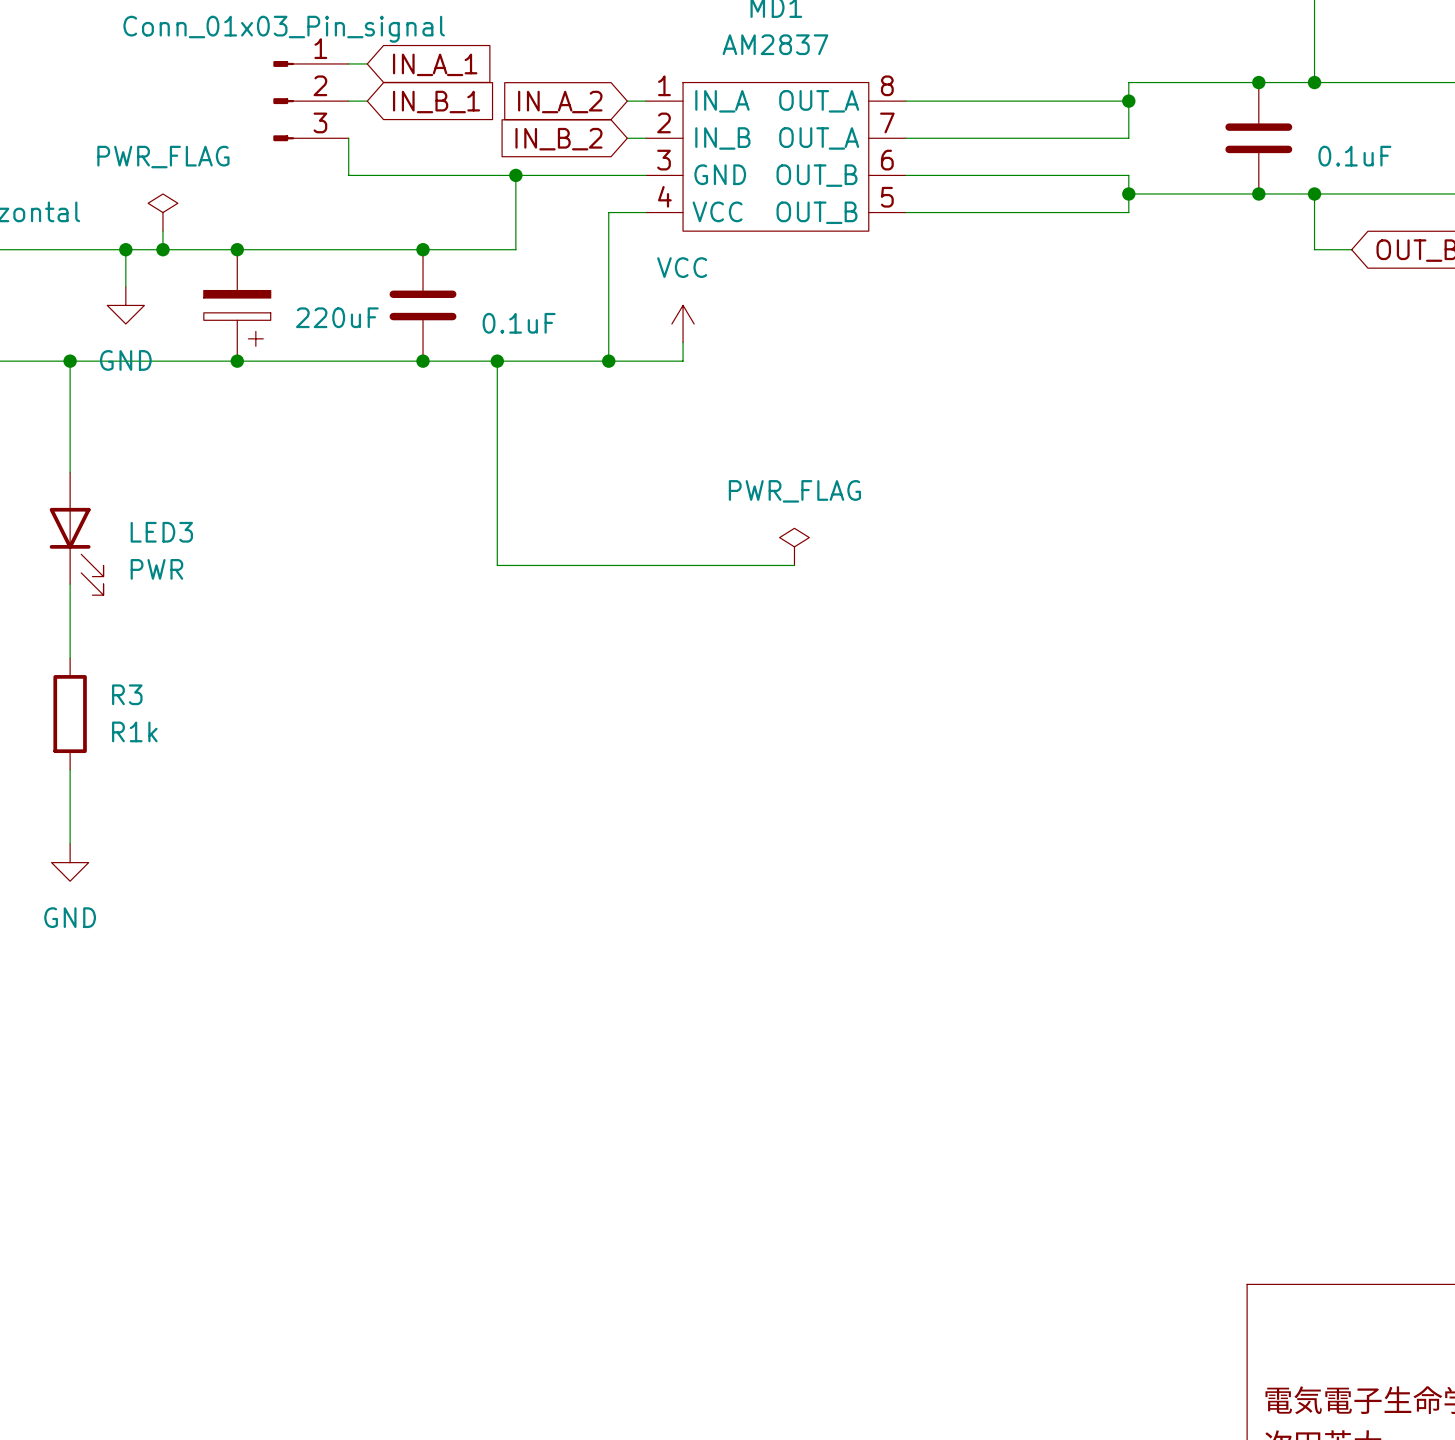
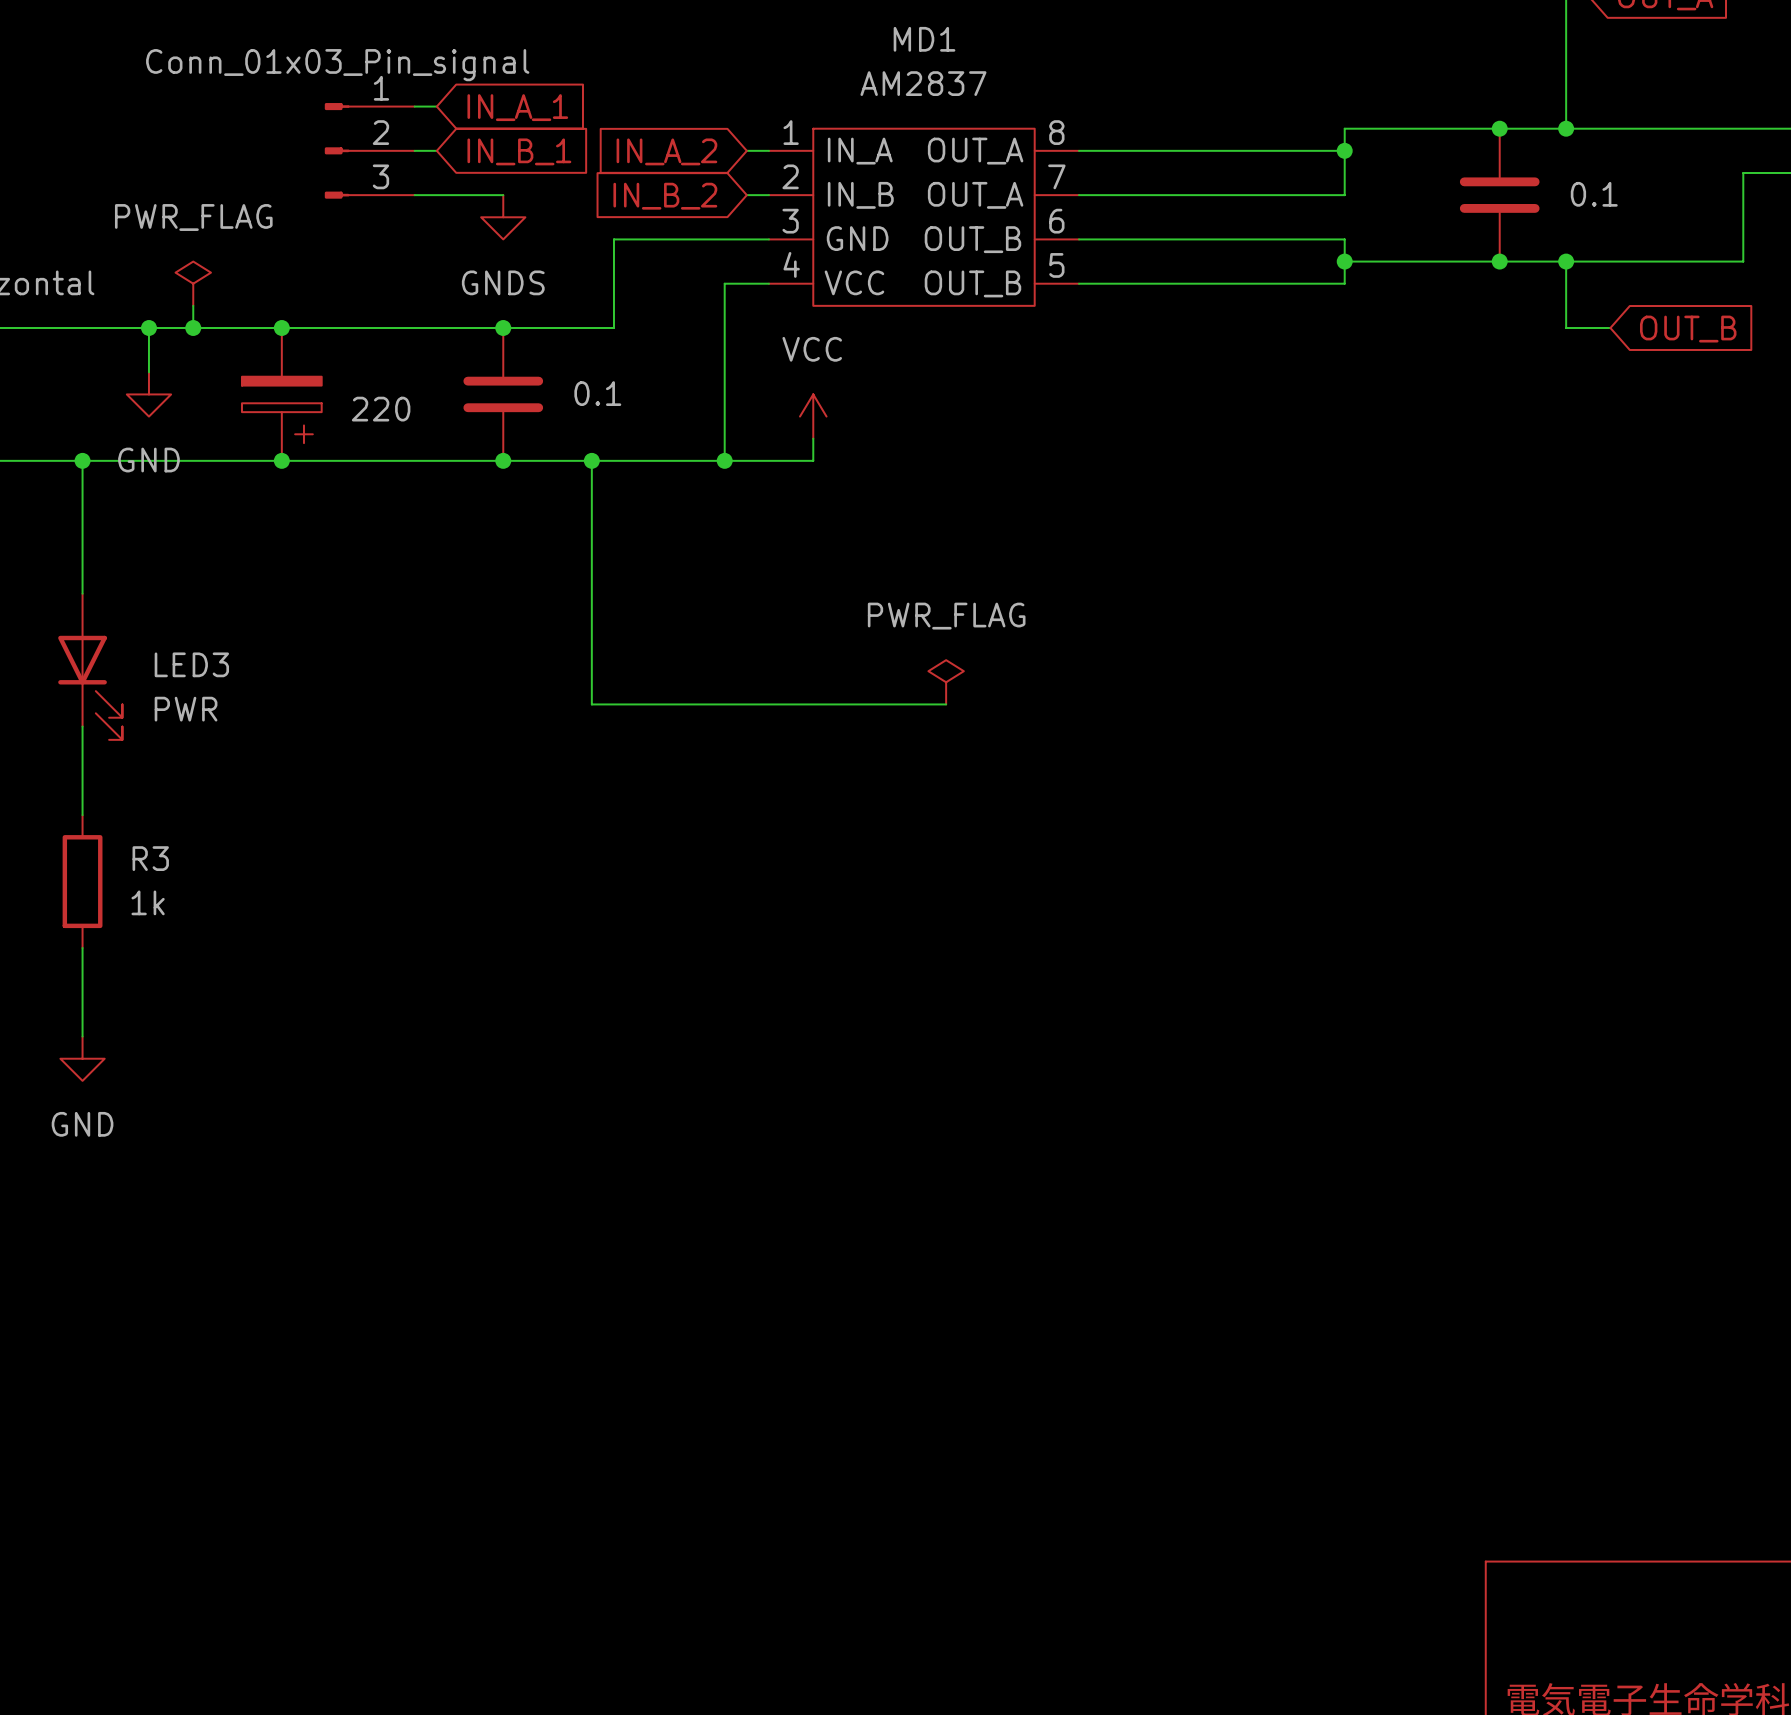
wire: (348, 138) (348, 175) (515, 175) -> (414, 195) (503, 195)
power symbol: none -> GNDS (503, 217)
part value: 0.1uF (1354, 156) -> 0.1 (1594, 194)
junction: (515, 175) -> none
part value: 220uF (337, 317) -> 220 (381, 409)
part value: 0.1uF (519, 323) -> 0.1 (597, 393)
R3 value: R1k (134, 731) -> 1k (148, 902)

